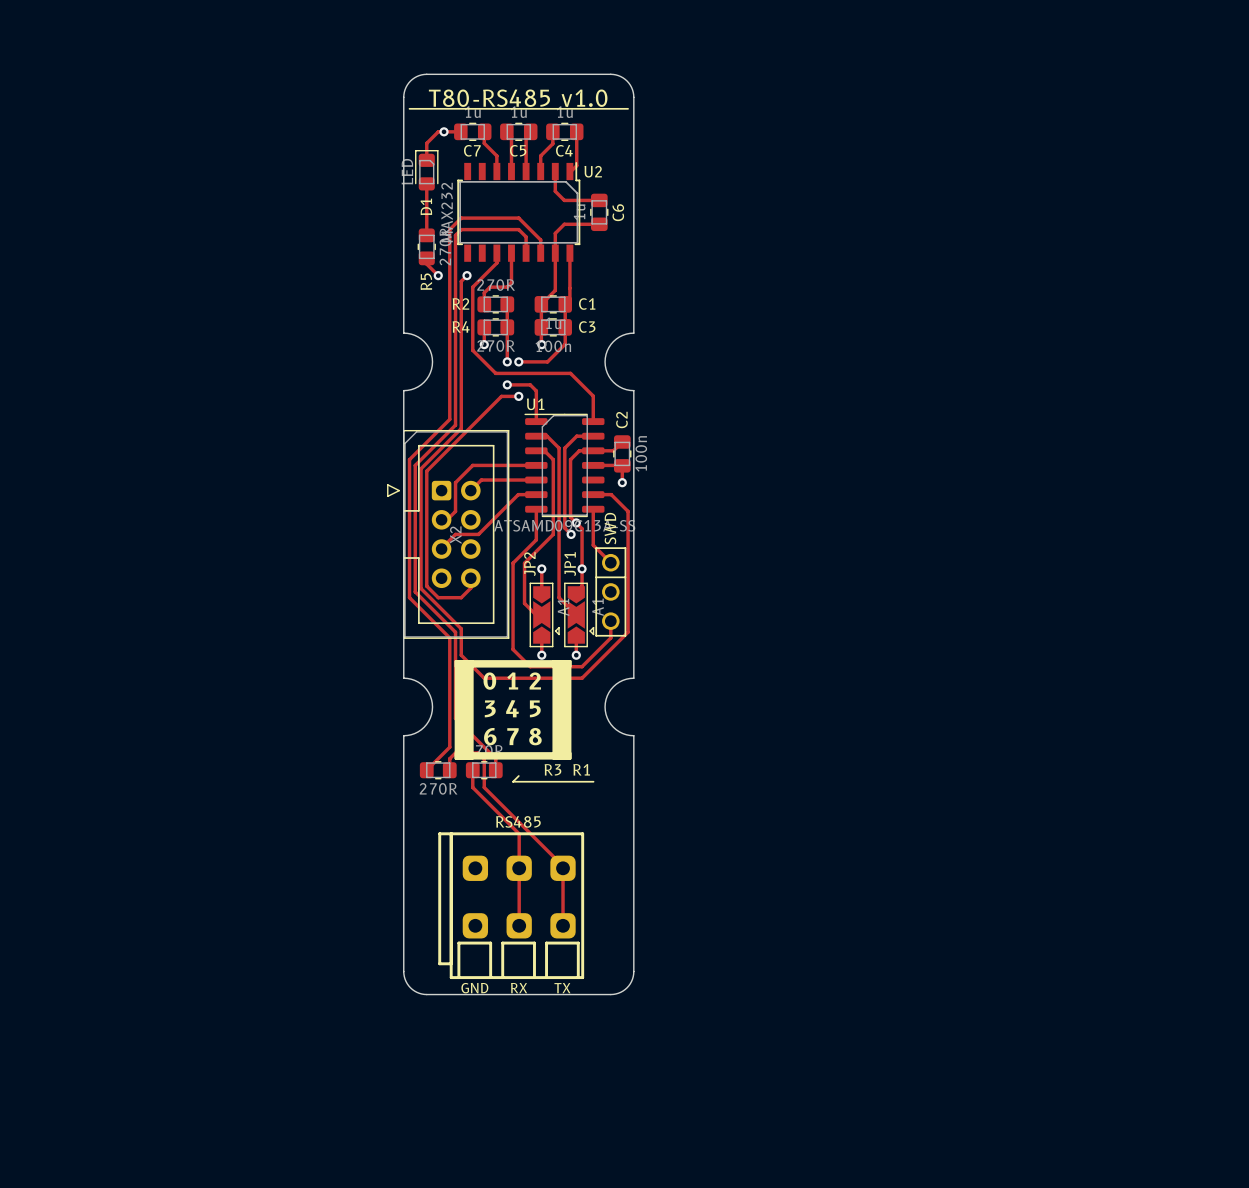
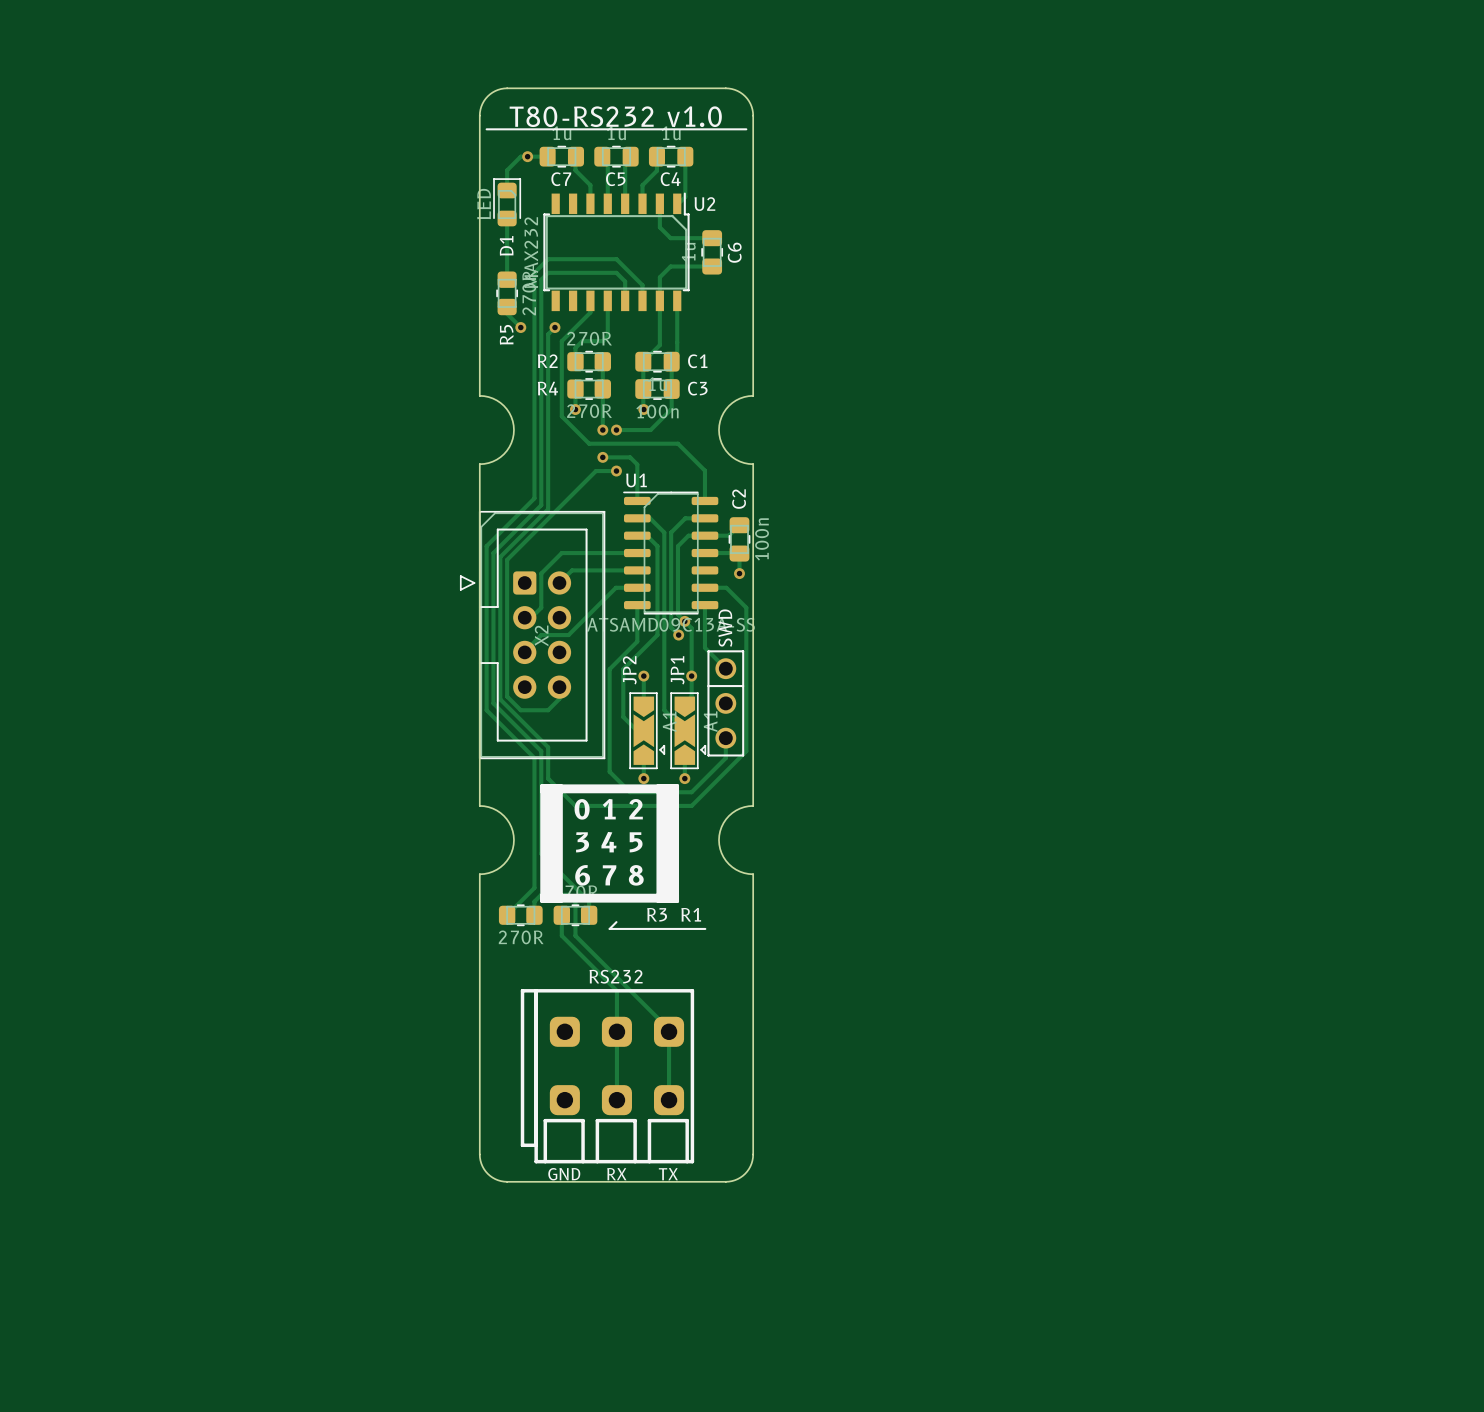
text: T80-RS485 v1.0 (518, 98) -> T80-RS232 v1.0 (615, 116)
part value: RS485 (518, 821) -> RS232 (616, 976)

